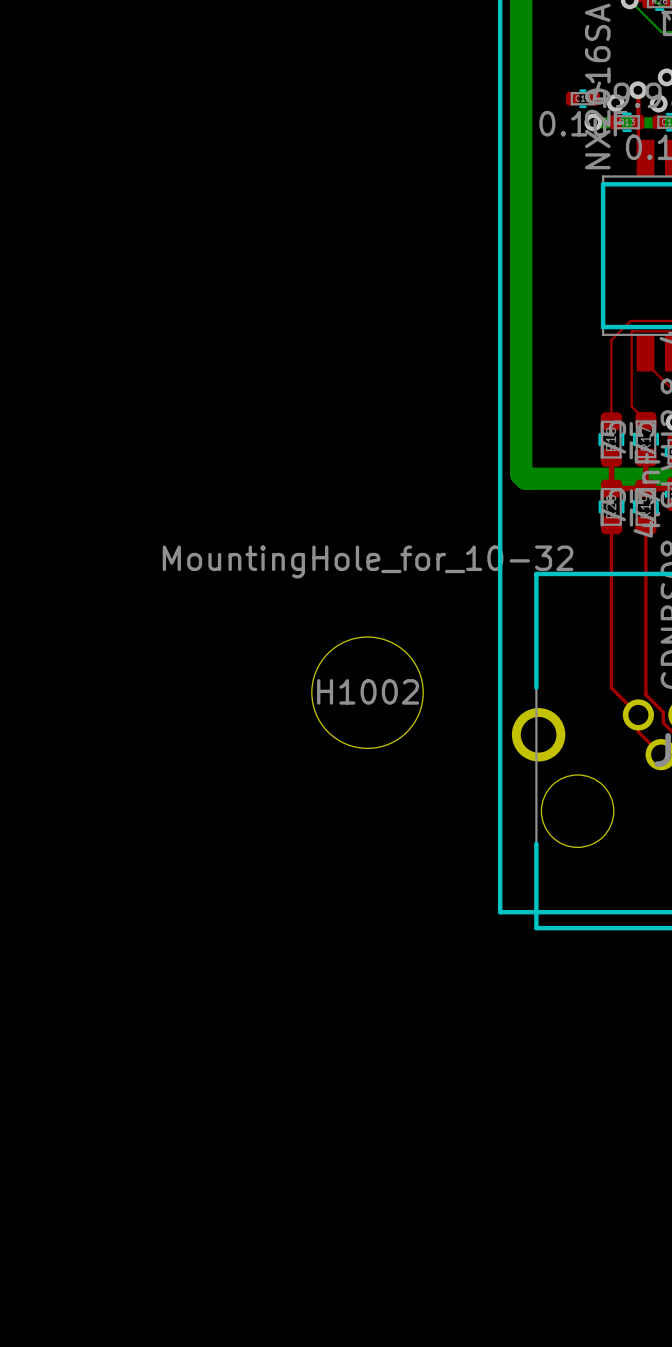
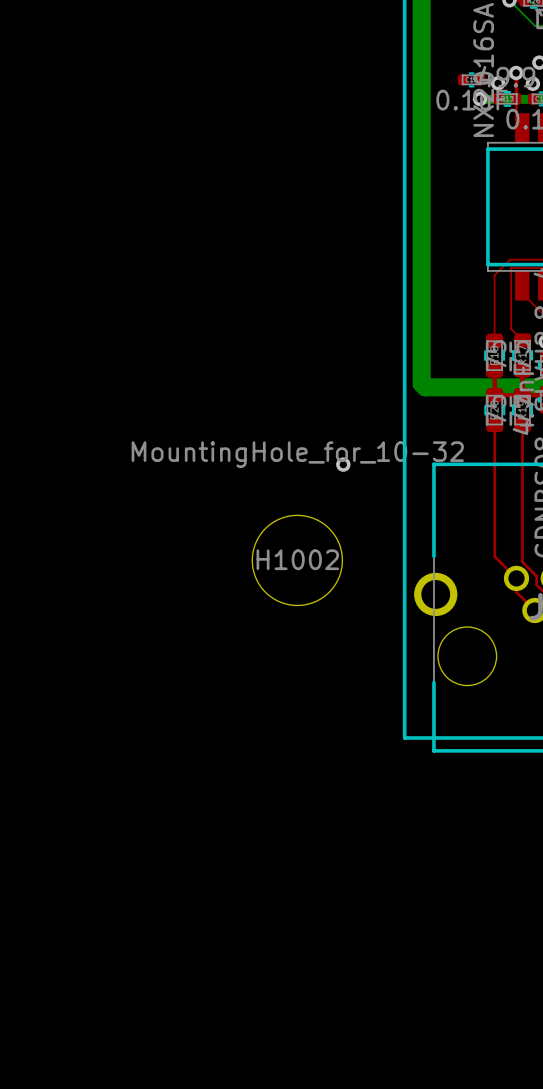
via: none -> (343, 464)

